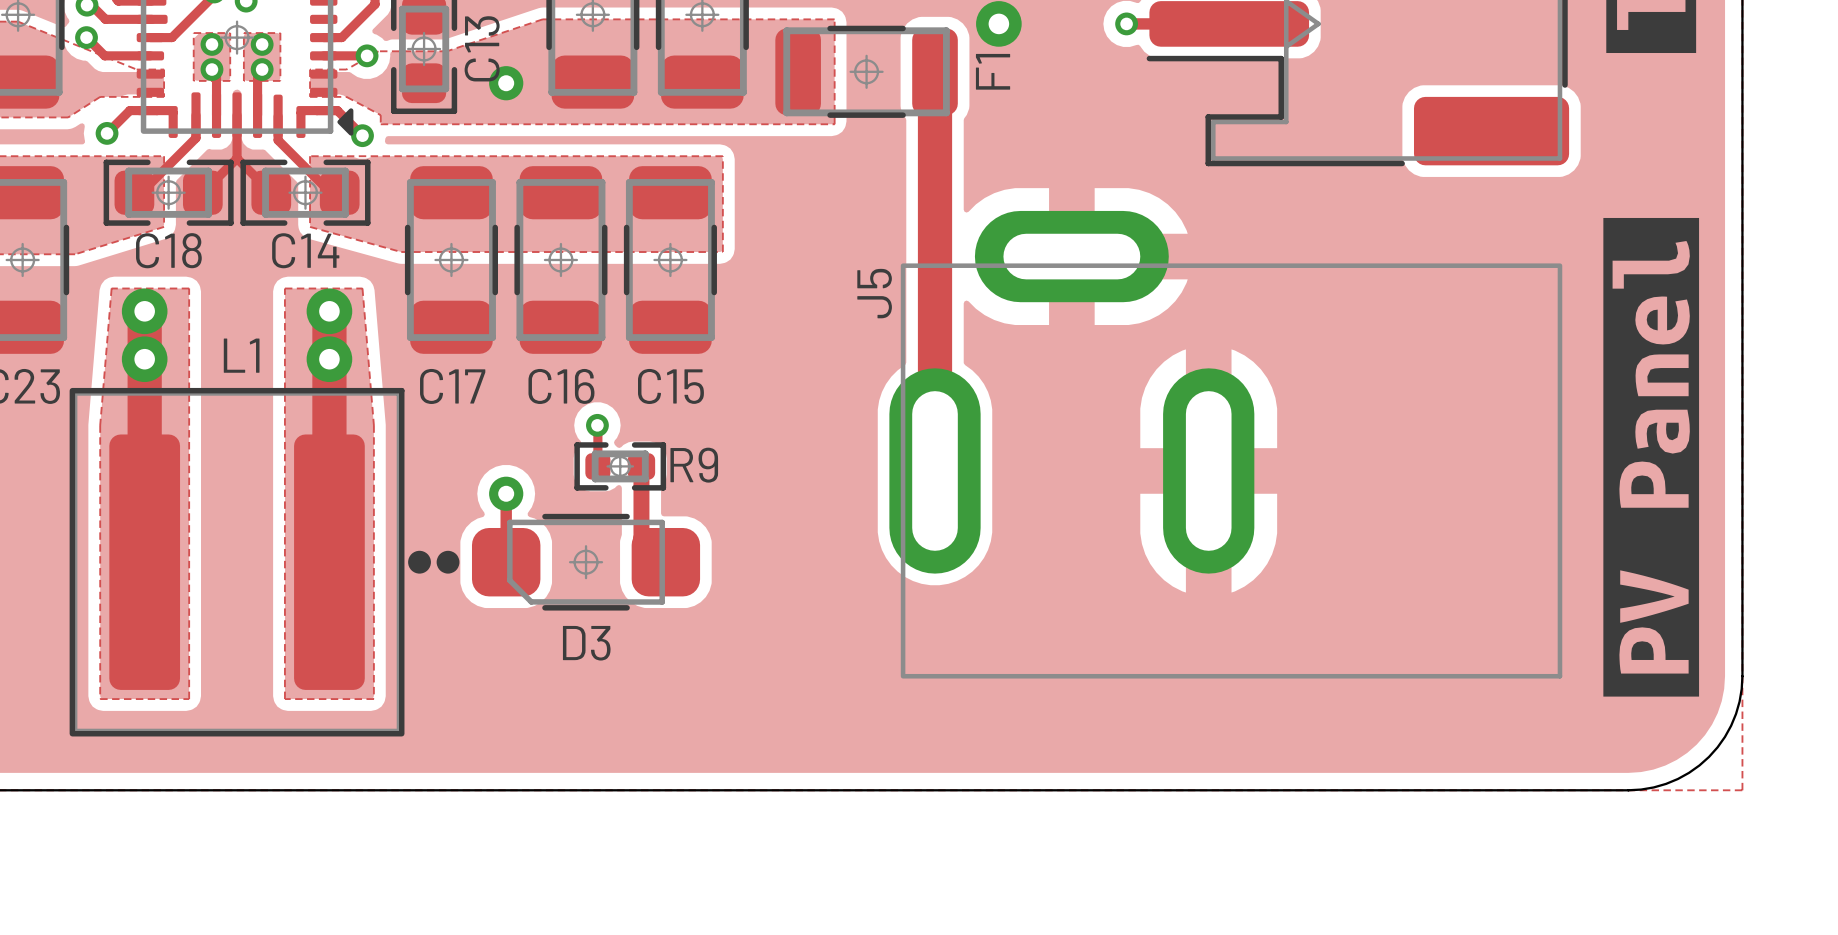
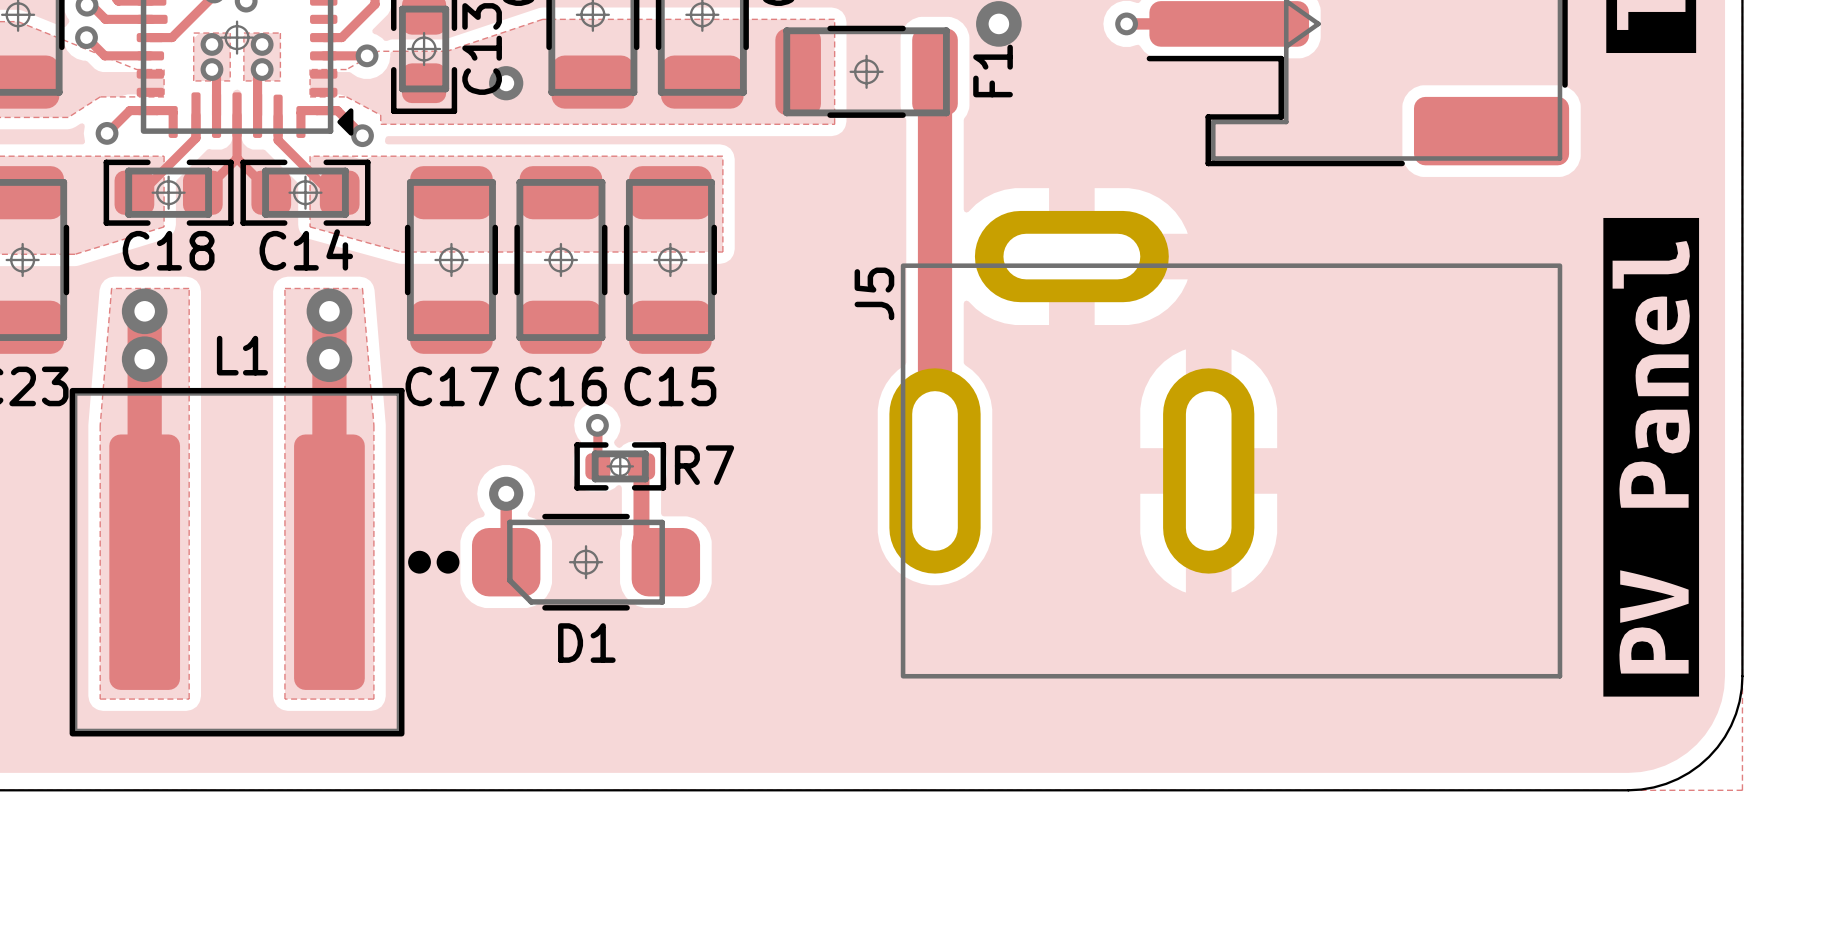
R9 name: R9 (694, 465) -> R7 (704, 465)
D3 name: D3 (586, 643) -> D1 (586, 643)

